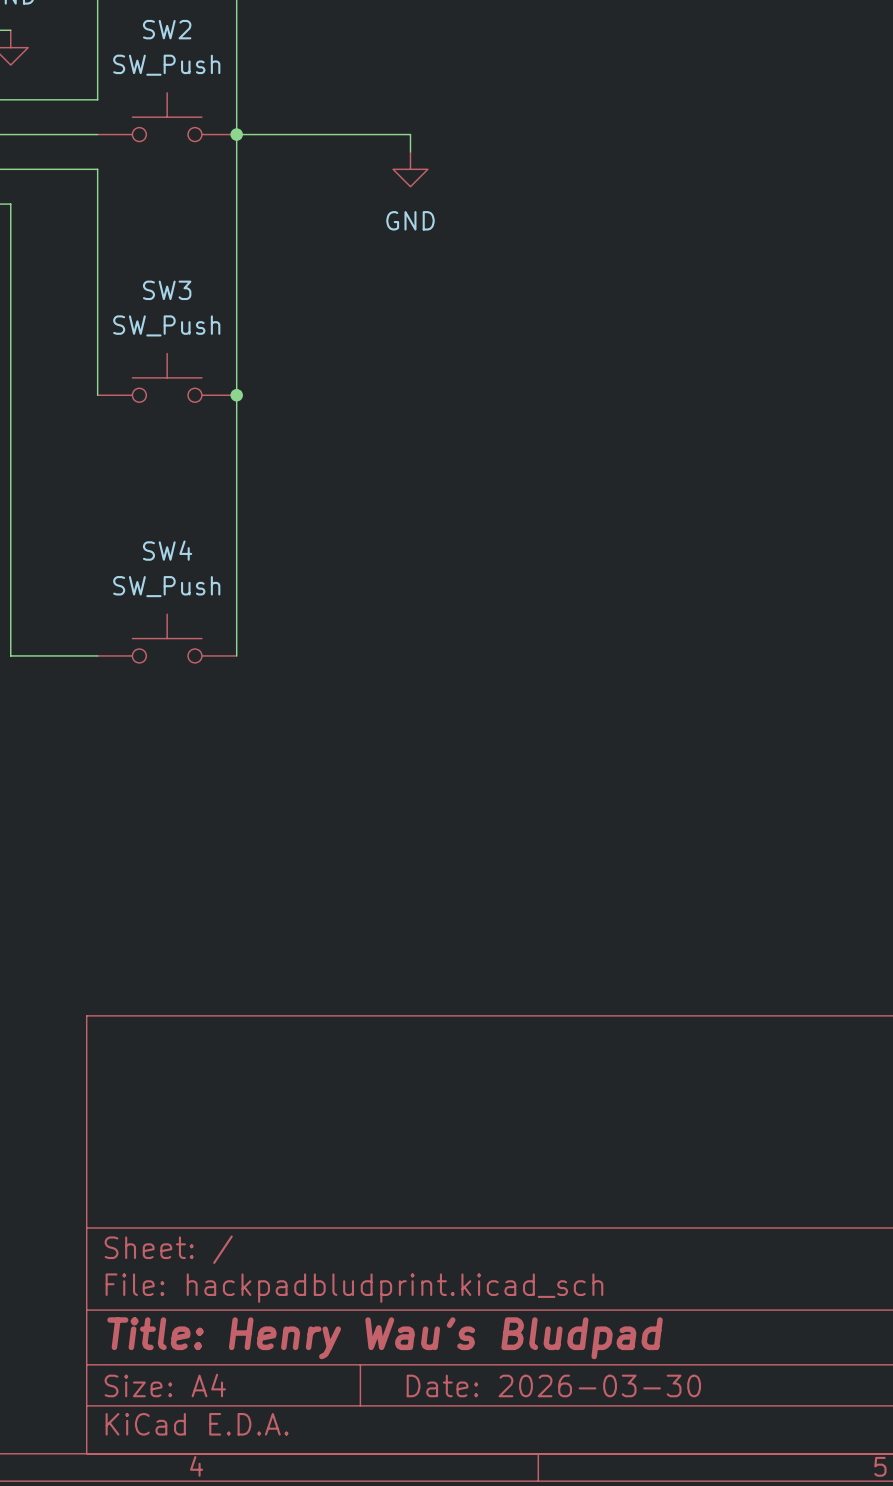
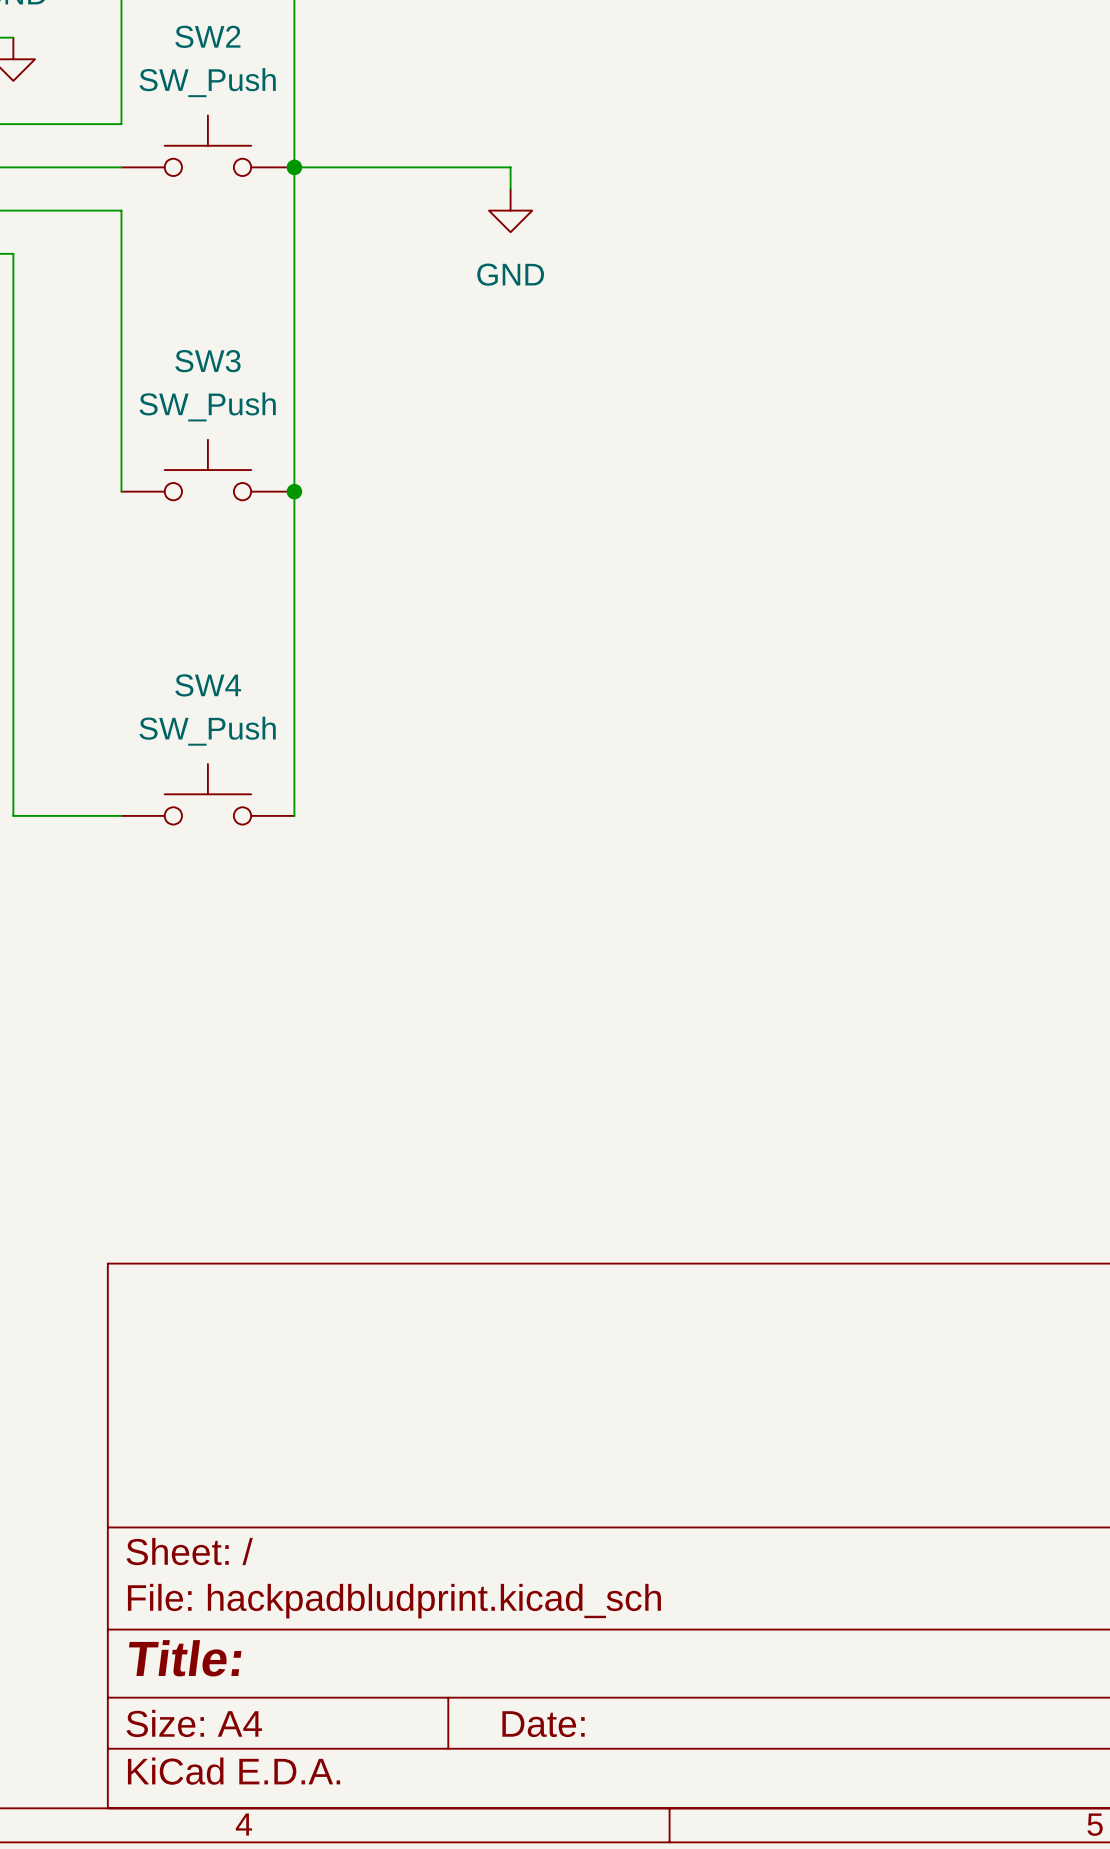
title block: Title: Henry Wau's Bludpad (385, 1338) -> Title: (185, 1658)
title block: Date: 2026-03-30 (553, 1385) -> Date: (543, 1724)

